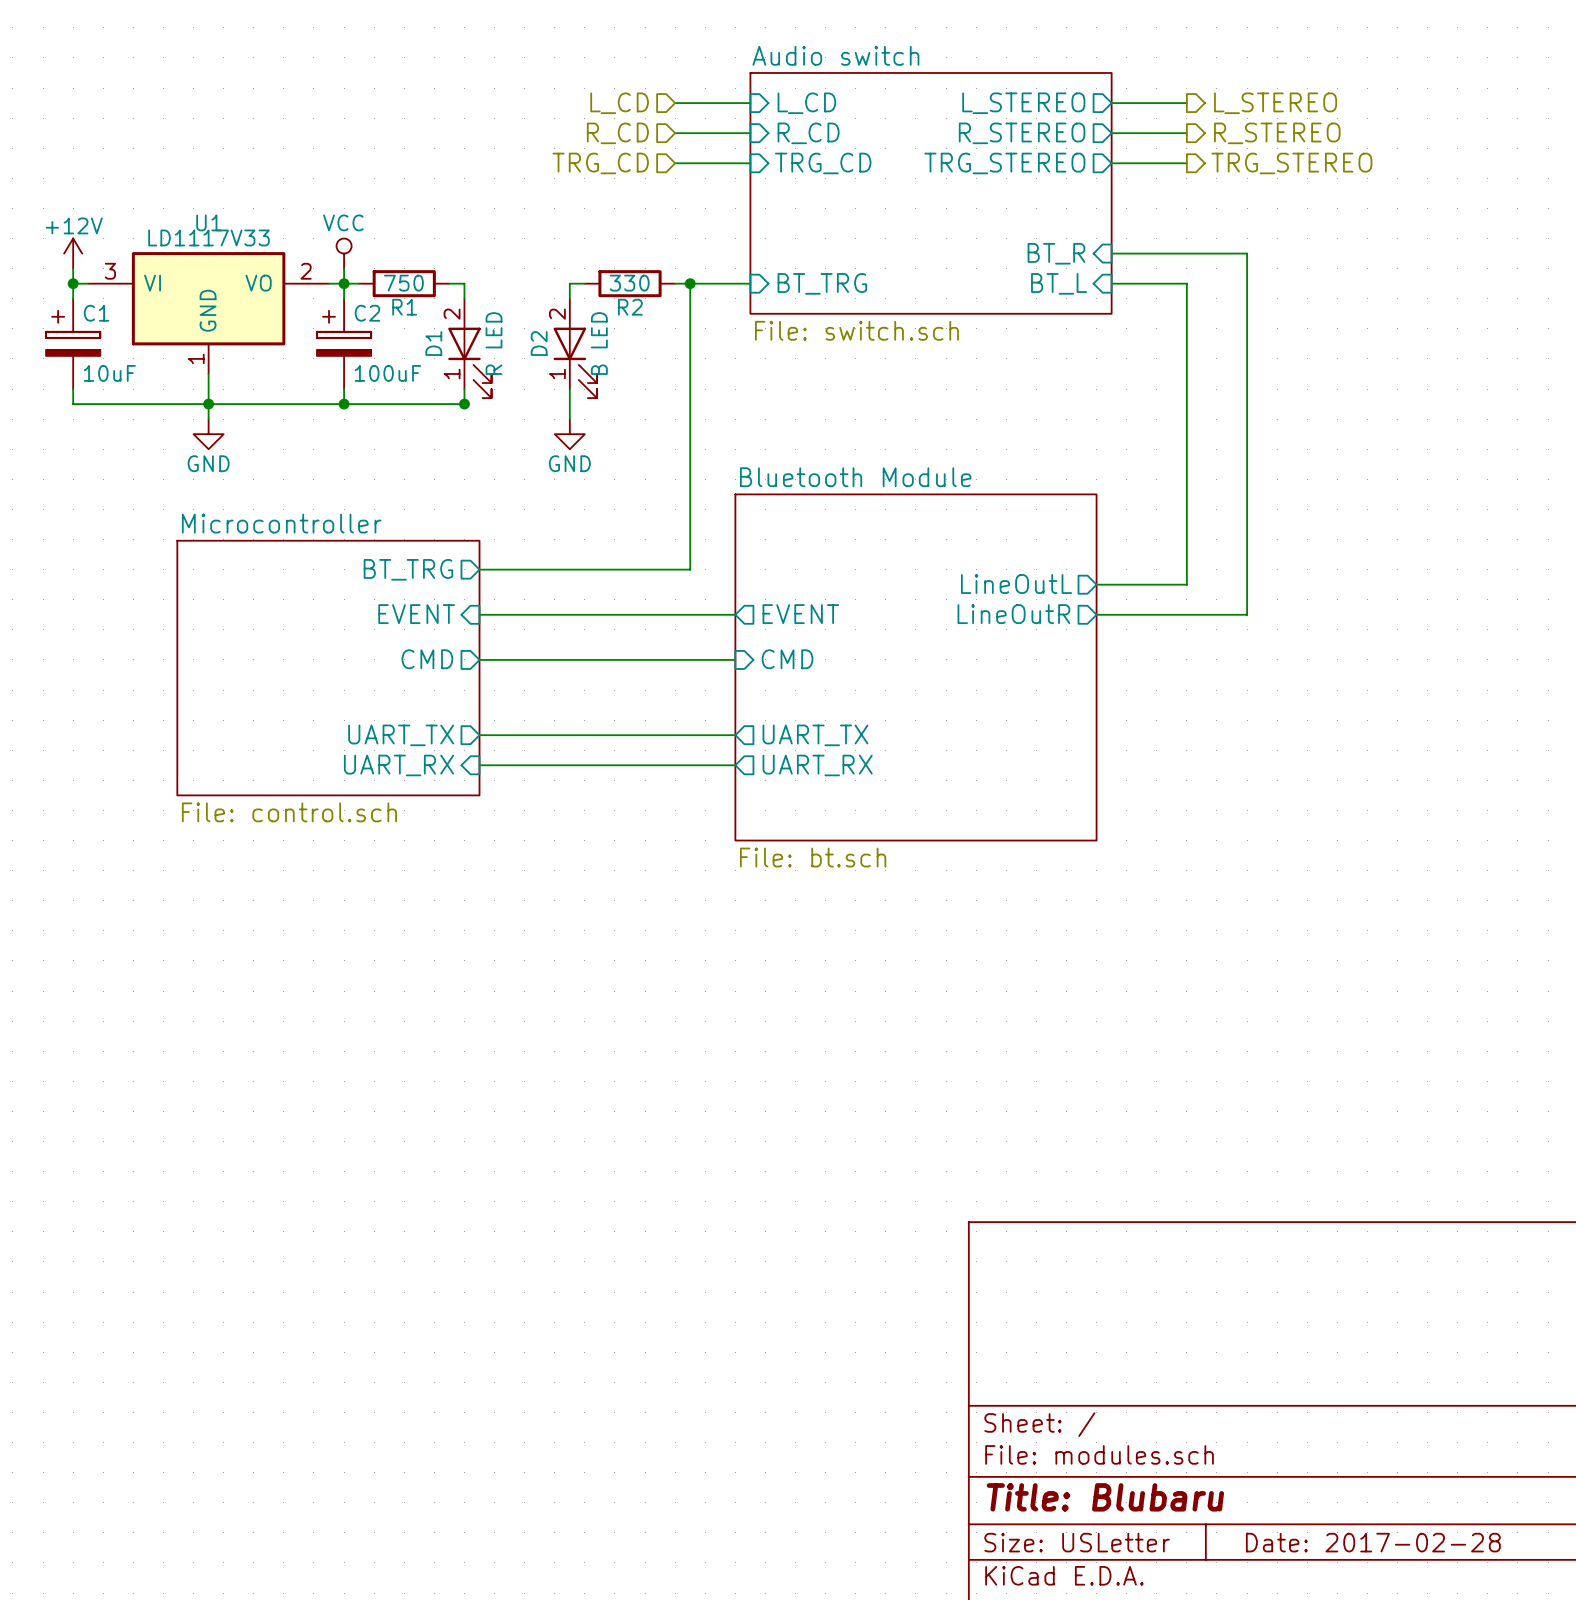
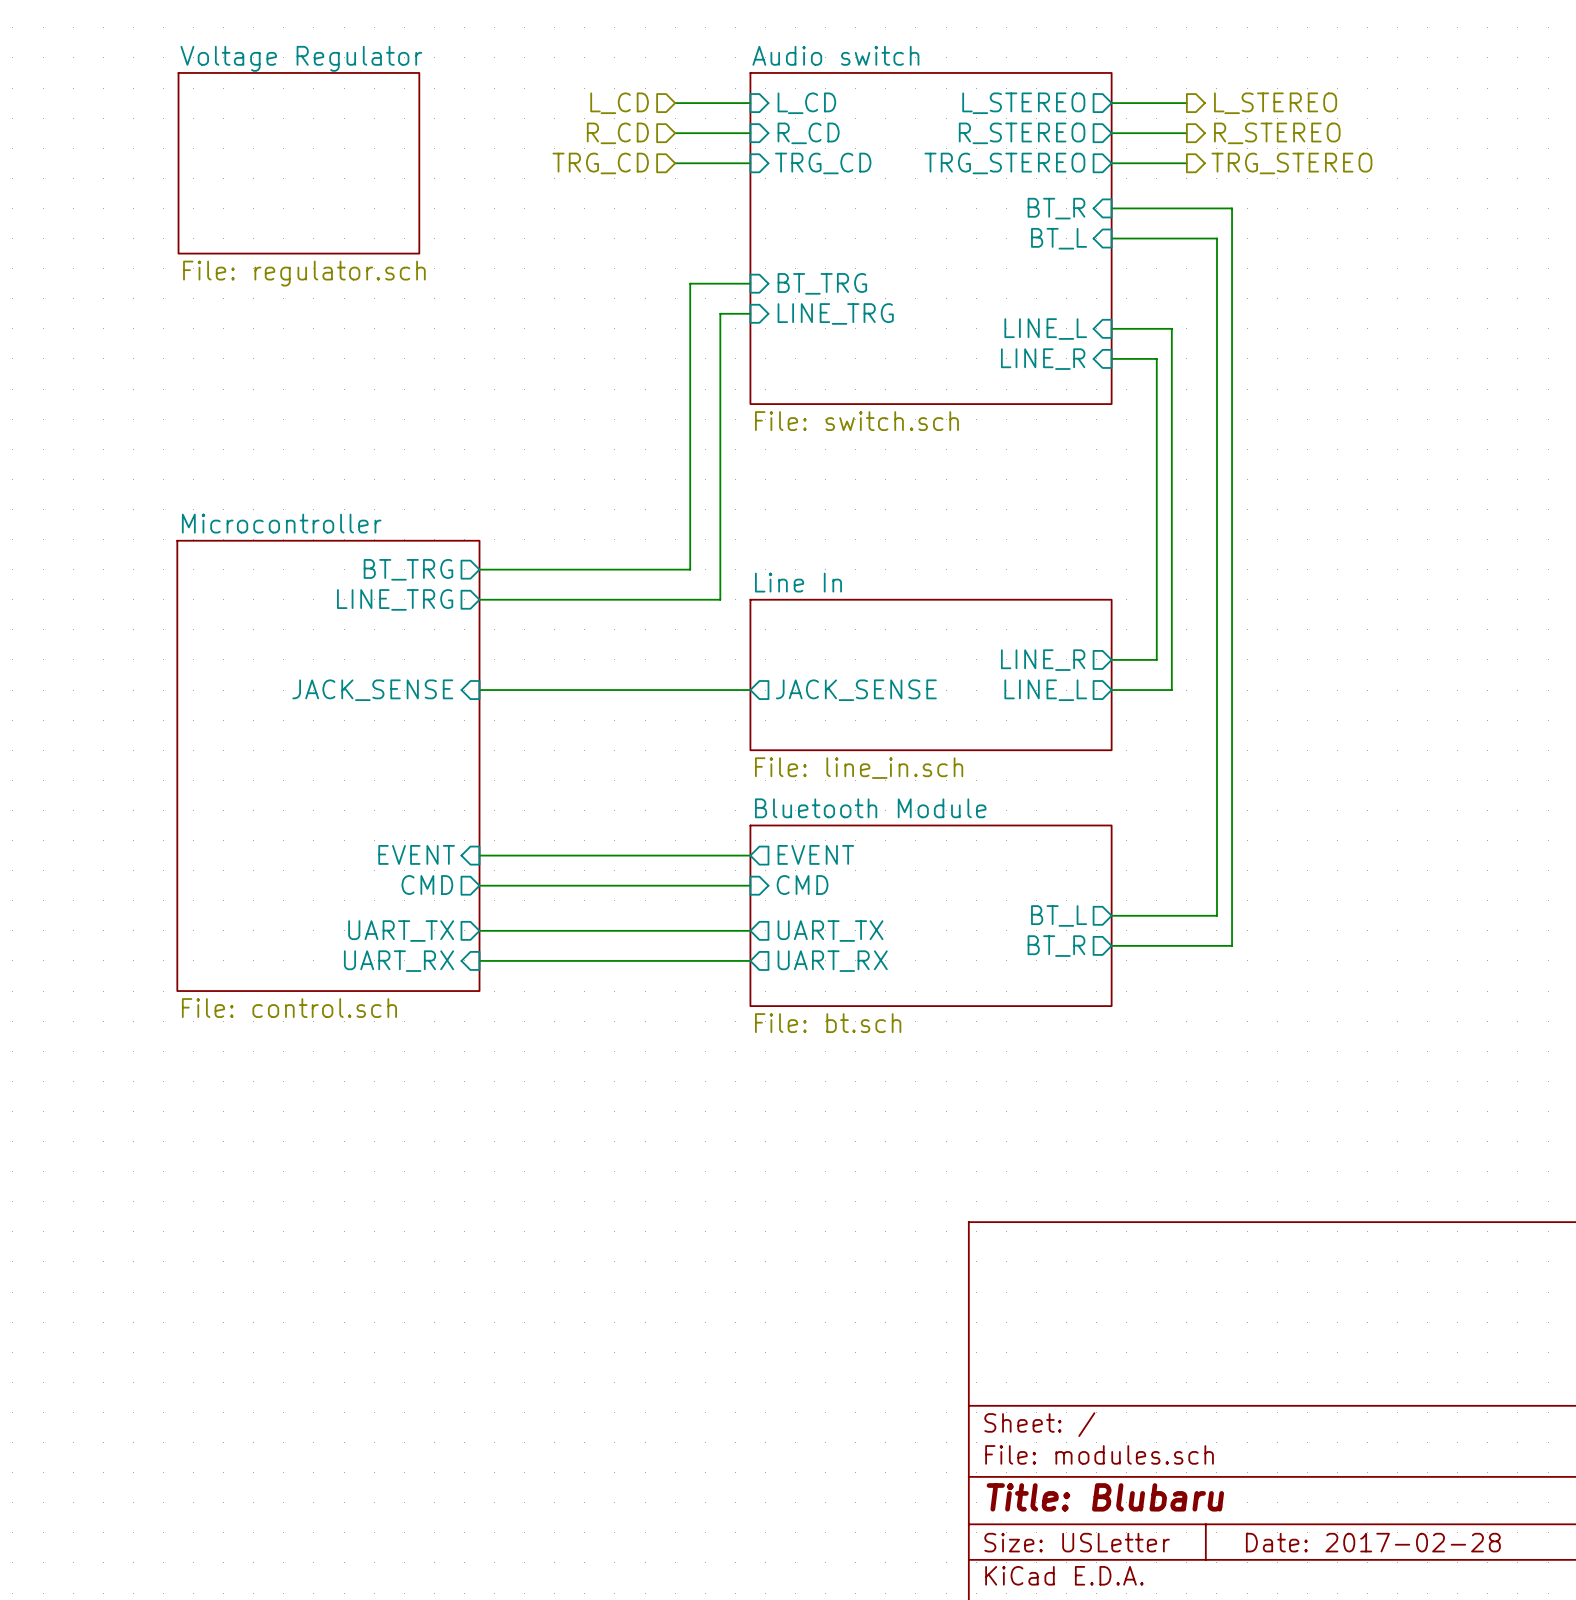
sheet Voltage Regulator: none -> File: regulator.sch (298, 163)
sheet Audio switch: File: switch.sch (931, 193) -> none
wire: none -> (1111, 208) (1232, 208) (1232, 945) (1111, 945)
sheet Audio switch: none -> File: switch.sch (931, 238)
wire: none -> (1111, 238) (1216, 238) (1216, 915) (1111, 915)
power symbol: +12V (73, 253) -> none
power symbol: VCC (344, 253) -> none
sheet pin position: BT_R (1056, 253) -> BT_R (1056, 208)
wire: (1111, 253) (1247, 253) (1247, 614) (1096, 614) -> none
wire: (73, 268) (73, 298) -> none
wire: (344, 268) (344, 298) -> none
wire: (73, 283) (88, 283) -> none
junction: (73, 283) -> none
wire: (329, 283) (359, 283) -> none
junction: (344, 283) -> none
R1: 750 (404, 283) -> none
wire: (449, 283) (464, 283) (464, 298) -> none
wire: (584, 283) (569, 283) (569, 298) -> none
R2: 330 (630, 283) -> none
wire: (675, 283) (690, 283) -> none
junction: (690, 283) -> none
sheet pin position: BT_L (1059, 283) -> BT_L (1059, 238)
wire: (1111, 283) (1186, 283) (1186, 584) (1096, 584) -> none
U1: LD1117V33 (208, 313) -> none
wire: none -> (750, 313) (720, 313) (720, 599) (479, 599)
sheet pin: none -> LINE_TRG (835, 313)
wire: none -> (1111, 328) (1171, 328) (1171, 690) (1111, 690)
sheet pin: none -> LINE_L (1045, 329)
C1: 10uF (73, 343) -> none
C2: 100uF (344, 343) -> none
D1: R LED (469, 348) -> none
D2: B LED (575, 348) -> none
wire: none -> (1111, 358) (1156, 358) (1156, 659) (1111, 659)
sheet pin: none -> LINE_R (1043, 359)
wire: (208, 373) (208, 419) -> none
wire: (73, 389) (73, 404) (464, 404) (464, 389) -> none
wire: (344, 389) (344, 404) -> none
wire: (569, 389) (569, 419) -> none
junction: (208, 404) -> none
junction: (344, 404) -> none
junction: (464, 404) -> none
power symbol: GND (208, 434) -> none
power symbol: GND (569, 434) -> none
sheet pin: LineOutL (1016, 584) -> none
sheet pin: none -> LINE_TRG (395, 599)
sheet pin: EVENT (416, 614) -> none
wire: (479, 614) (735, 614) -> none
sheet pin: EVENT (800, 614) -> none
sheet pin: LineOutR (1013, 614) -> none
sheet pin: CMD (427, 659) -> none
wire: (479, 659) (735, 659) -> none
sheet pin: CMD (787, 659) -> none
sheet pin: none -> LINE_R (1043, 660)
sheet Bluetooth Module: File: bt.sch (915, 667) -> none
sheet Microcontroller: File: control.sch (328, 668) -> none
sheet Line In: none -> File: line_in.sch (931, 674)
sheet pin: none -> JACK_SENSE (372, 690)
wire: none -> (479, 690) (750, 690)
sheet pin: none -> JACK_SENSE (856, 690)
sheet pin: none -> LINE_L (1045, 690)
sheet pin: UART_TX (401, 735) -> none
wire: (479, 735) (735, 735) -> none
sheet pin: UART_TX (815, 735) -> none
sheet Microcontroller: none -> File: control.sch (328, 765)
sheet pin: UART_RX (398, 765) -> none
wire: (479, 765) (735, 765) -> none
sheet pin: UART_RX (817, 765) -> none
sheet pin: none -> EVENT (416, 854)
sheet pin: none -> EVENT (815, 854)
wire: none -> (479, 855) (750, 855)
sheet pin: none -> CMD (427, 885)
wire: none -> (479, 885) (750, 885)
sheet pin: none -> CMD (802, 885)
sheet Bluetooth Module: none -> File: bt.sch (931, 915)
sheet pin: none -> BT_L (1059, 915)
wire: none -> (479, 930) (750, 930)
sheet pin: none -> UART_TX (401, 931)
sheet pin: none -> UART_TX (830, 931)
sheet pin: none -> BT_R (1056, 946)
wire: none -> (479, 960) (750, 960)
sheet pin: none -> UART_RX (398, 961)
sheet pin: none -> UART_RX (832, 961)

